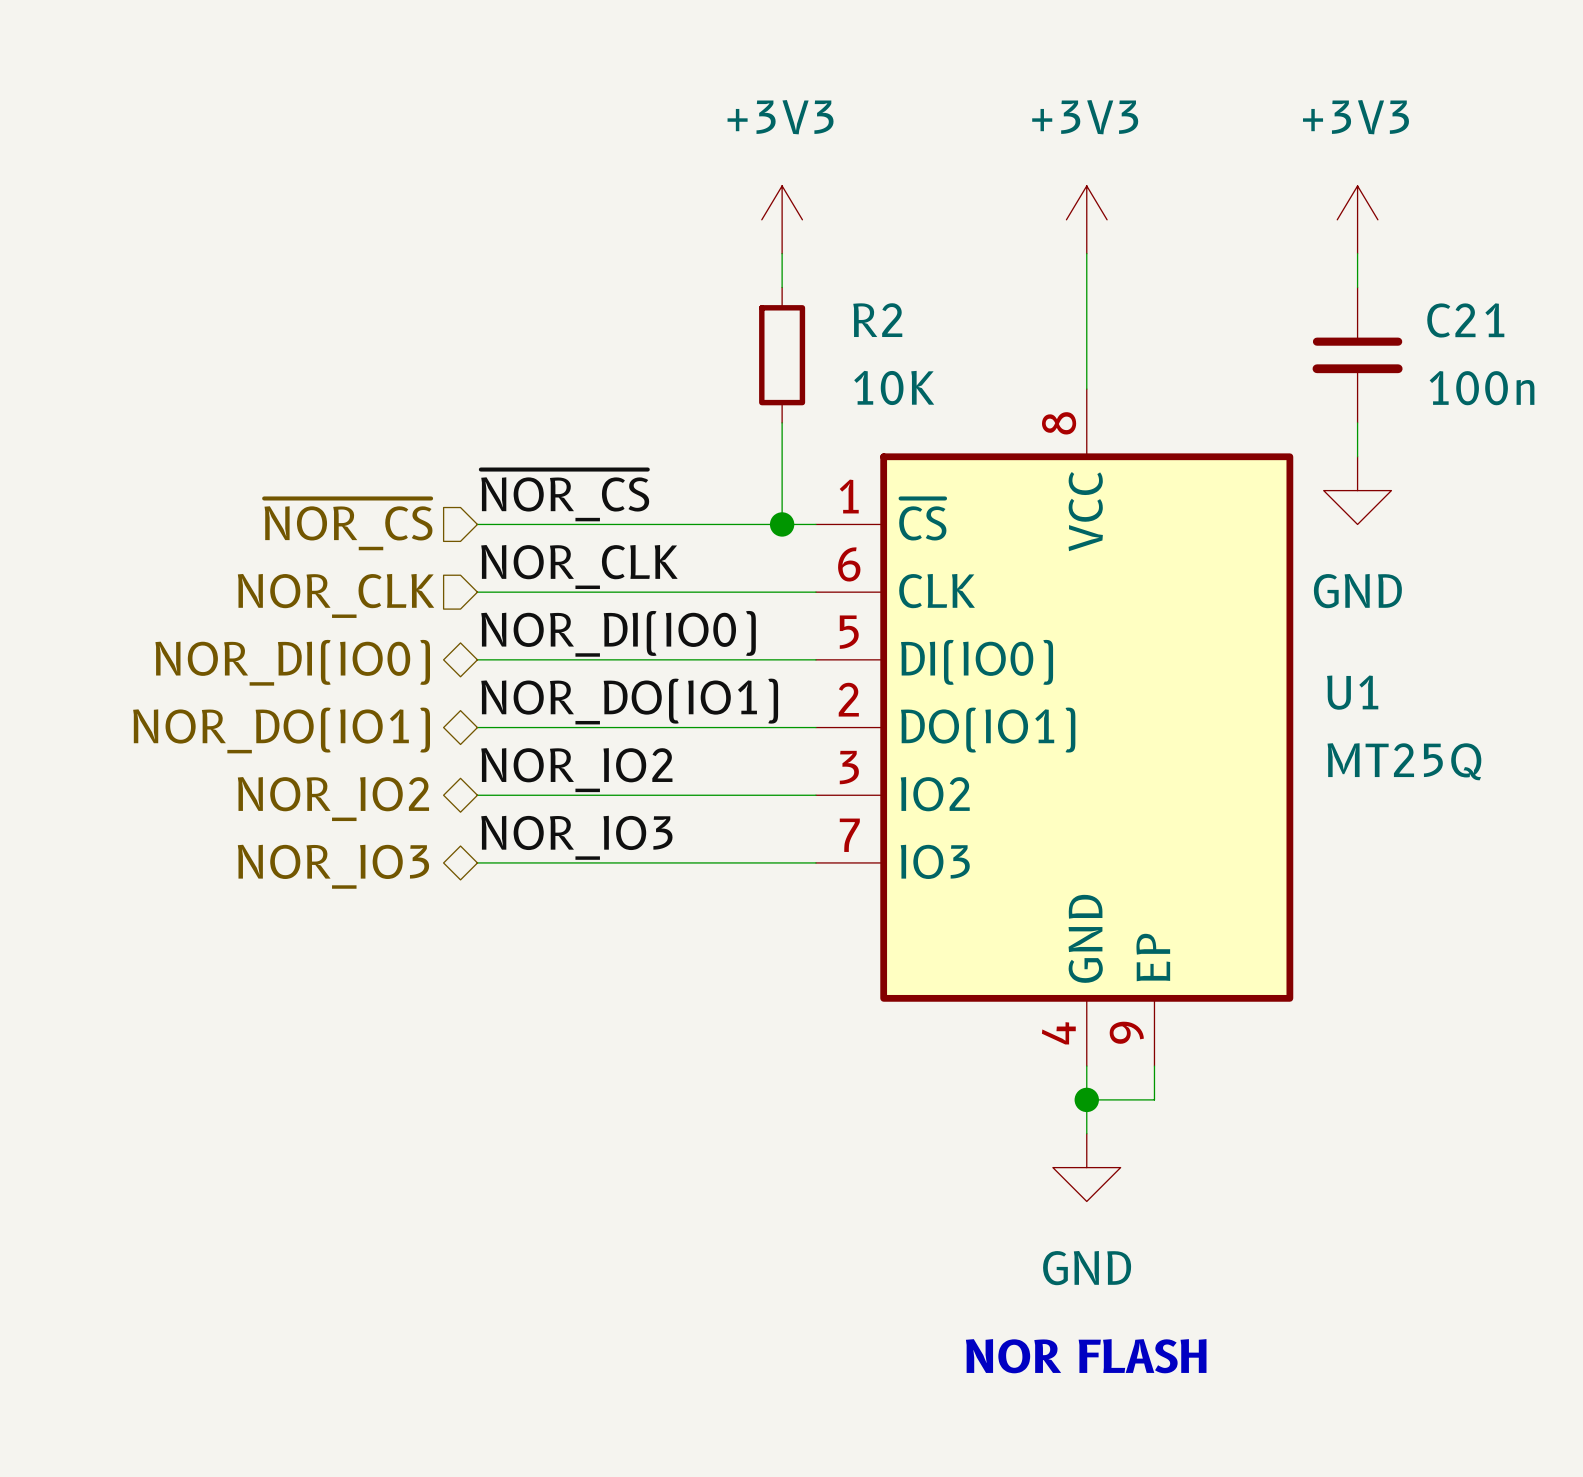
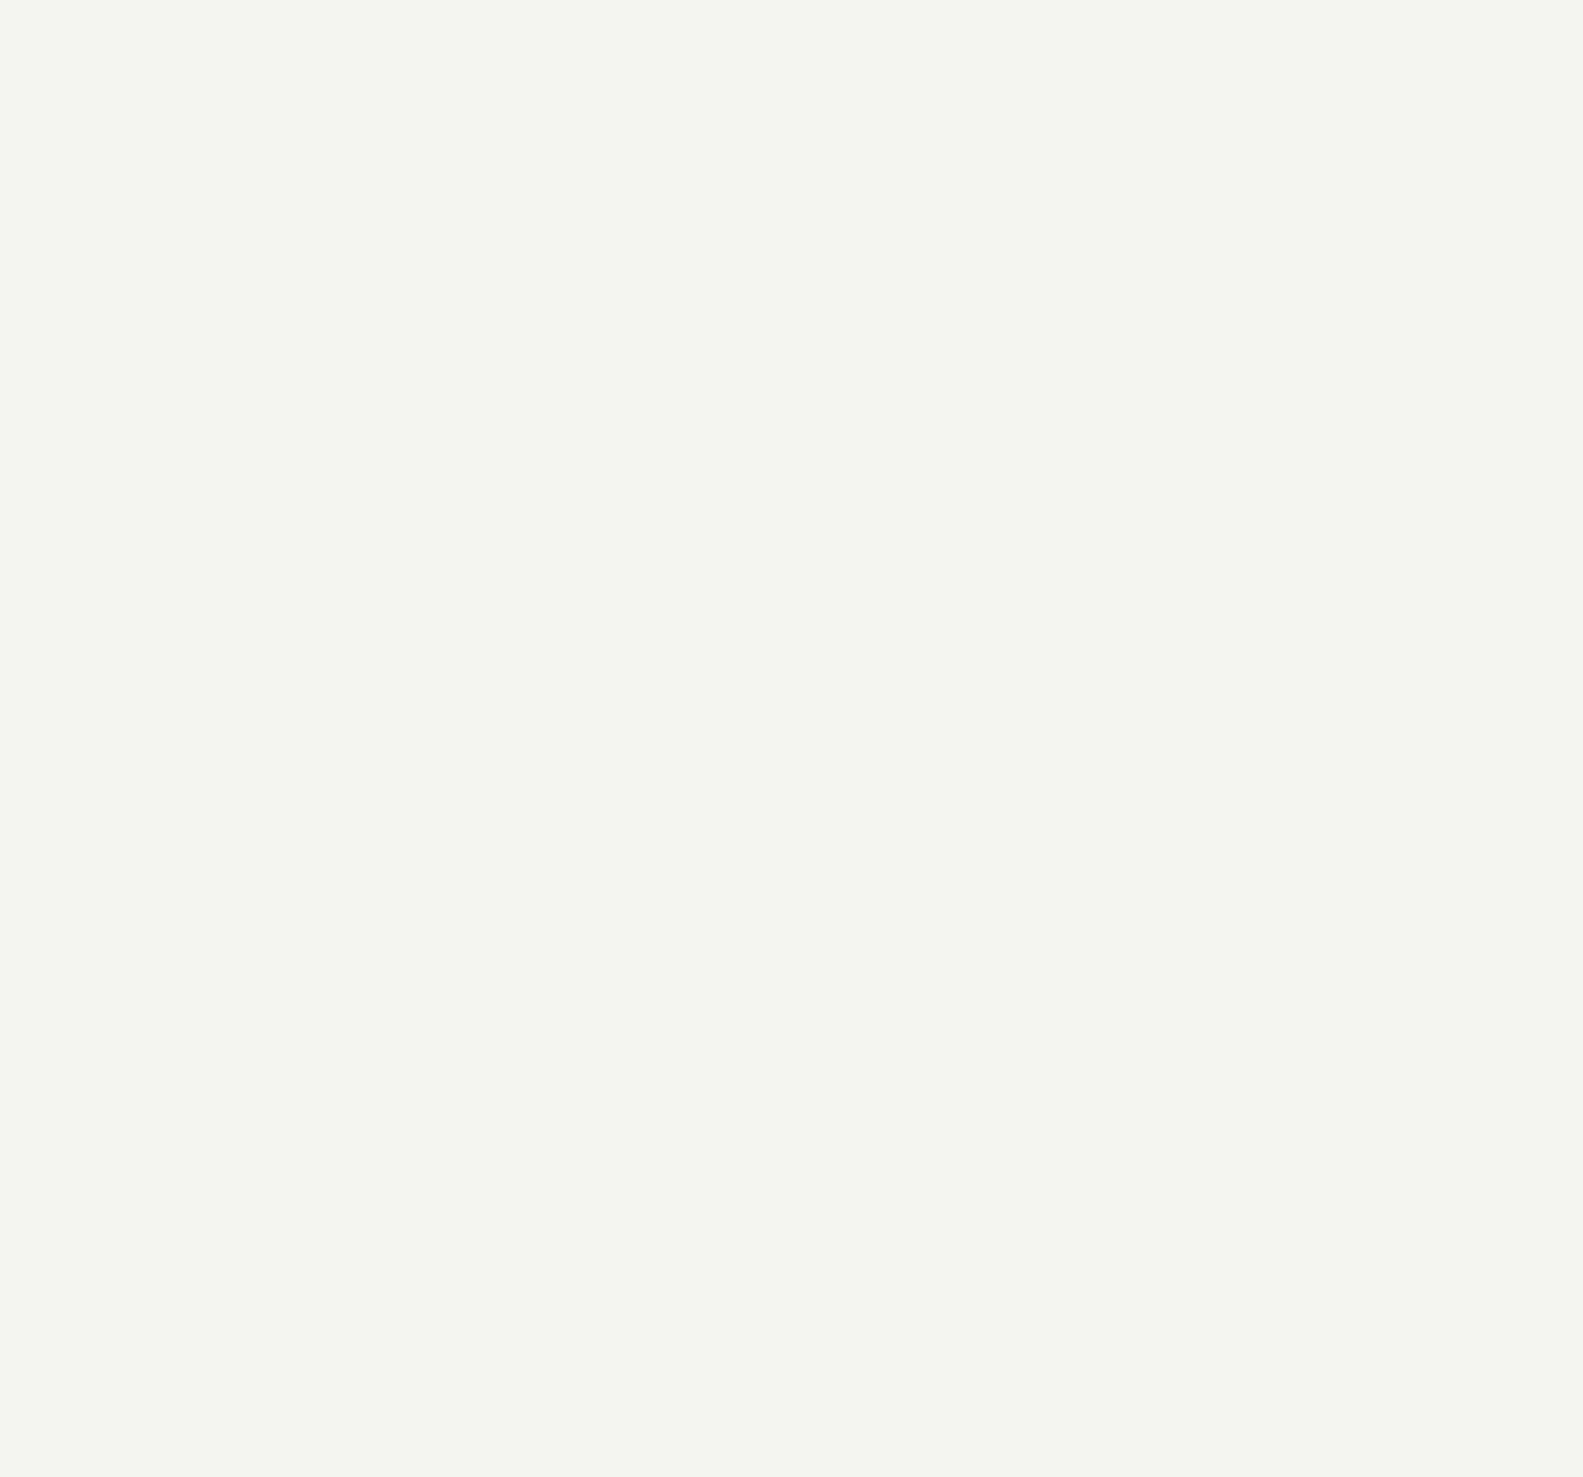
power symbol: +3V3 (782, 219) -> none
power symbol: +3V3 (1086, 219) -> none
power symbol: +3V3 (1357, 219) -> none
wire: (782, 253) (782, 287) -> none
wire: (1086, 253) (1086, 389) -> none
wire: (1357, 253) (1357, 287) -> none
R2: 10K (782, 355) -> none
C21: 100n (1357, 355) -> none
wire: (782, 422) (782, 524) -> none
wire: (1357, 422) (1357, 456) -> none
power symbol: GND (1357, 490) -> none
label: ~{NOR_CS} (564, 495) -> none
hierarchical label: ~{NOR_CS} (348, 524) -> none
wire: (477, 524) (815, 524) -> none
junction: (782, 524) -> none
label: NOR_CLK (579, 567) -> none
wire: (477, 592) (815, 592) -> none
hierarchical label: NOR_CLK (336, 595) -> none
label: NOR_DI(IO0) (618, 633) -> none
wire: (477, 659) (815, 659) -> none
hierarchical label: NOR_DI(IO0) (292, 662) -> none
label: NOR_DO(IO1) (629, 701) -> none
wire: (477, 727) (815, 727) -> none
U1: MT25Q (1054, 727) -> none
hierarchical label: NOR_DO(IO1) (281, 730) -> none
label: NOR_IO2 (576, 770) -> none
wire: (477, 795) (815, 795) -> none
hierarchical label: NOR_IO2 (333, 799) -> none
label: NOR_IO3 (576, 837) -> none
wire: (477, 862) (815, 862) -> none
hierarchical label: NOR_IO3 (333, 866) -> none
wire: (1086, 1066) (1086, 1133) -> none
wire: (1154, 1066) (1154, 1099) (1086, 1099) -> none
junction: (1086, 1099) -> none
power symbol: GND (1086, 1167) -> none
text: NOR FLASH (1086, 1356) -> none

